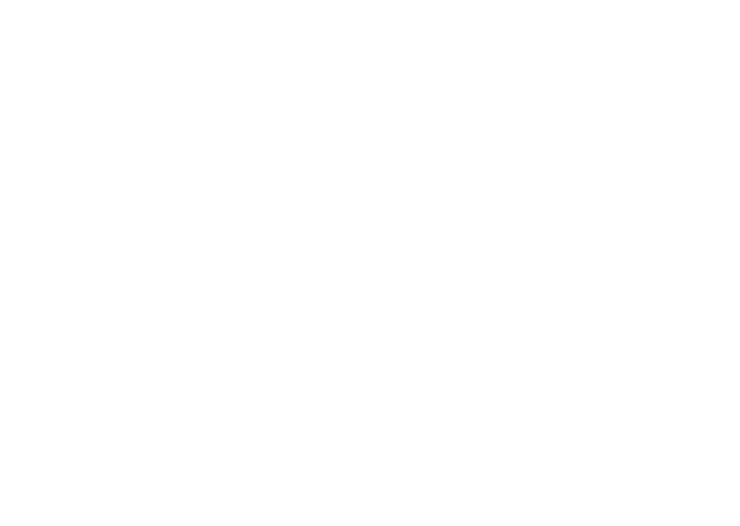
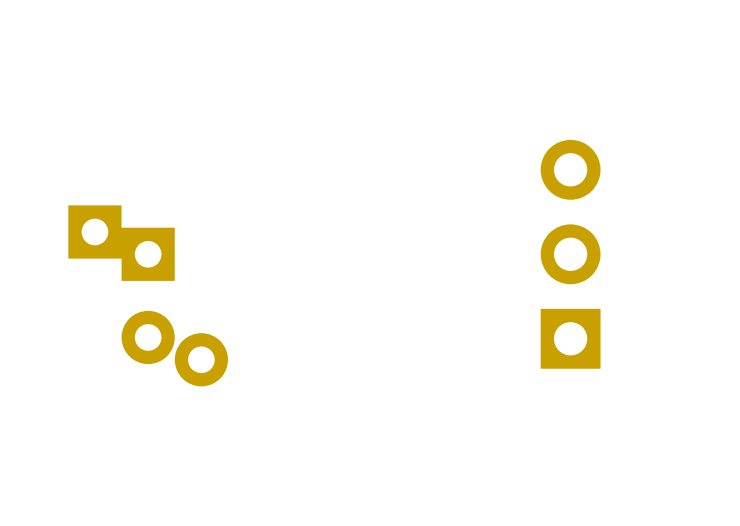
part: none -> (570, 254)
part: none -> (148, 295)

